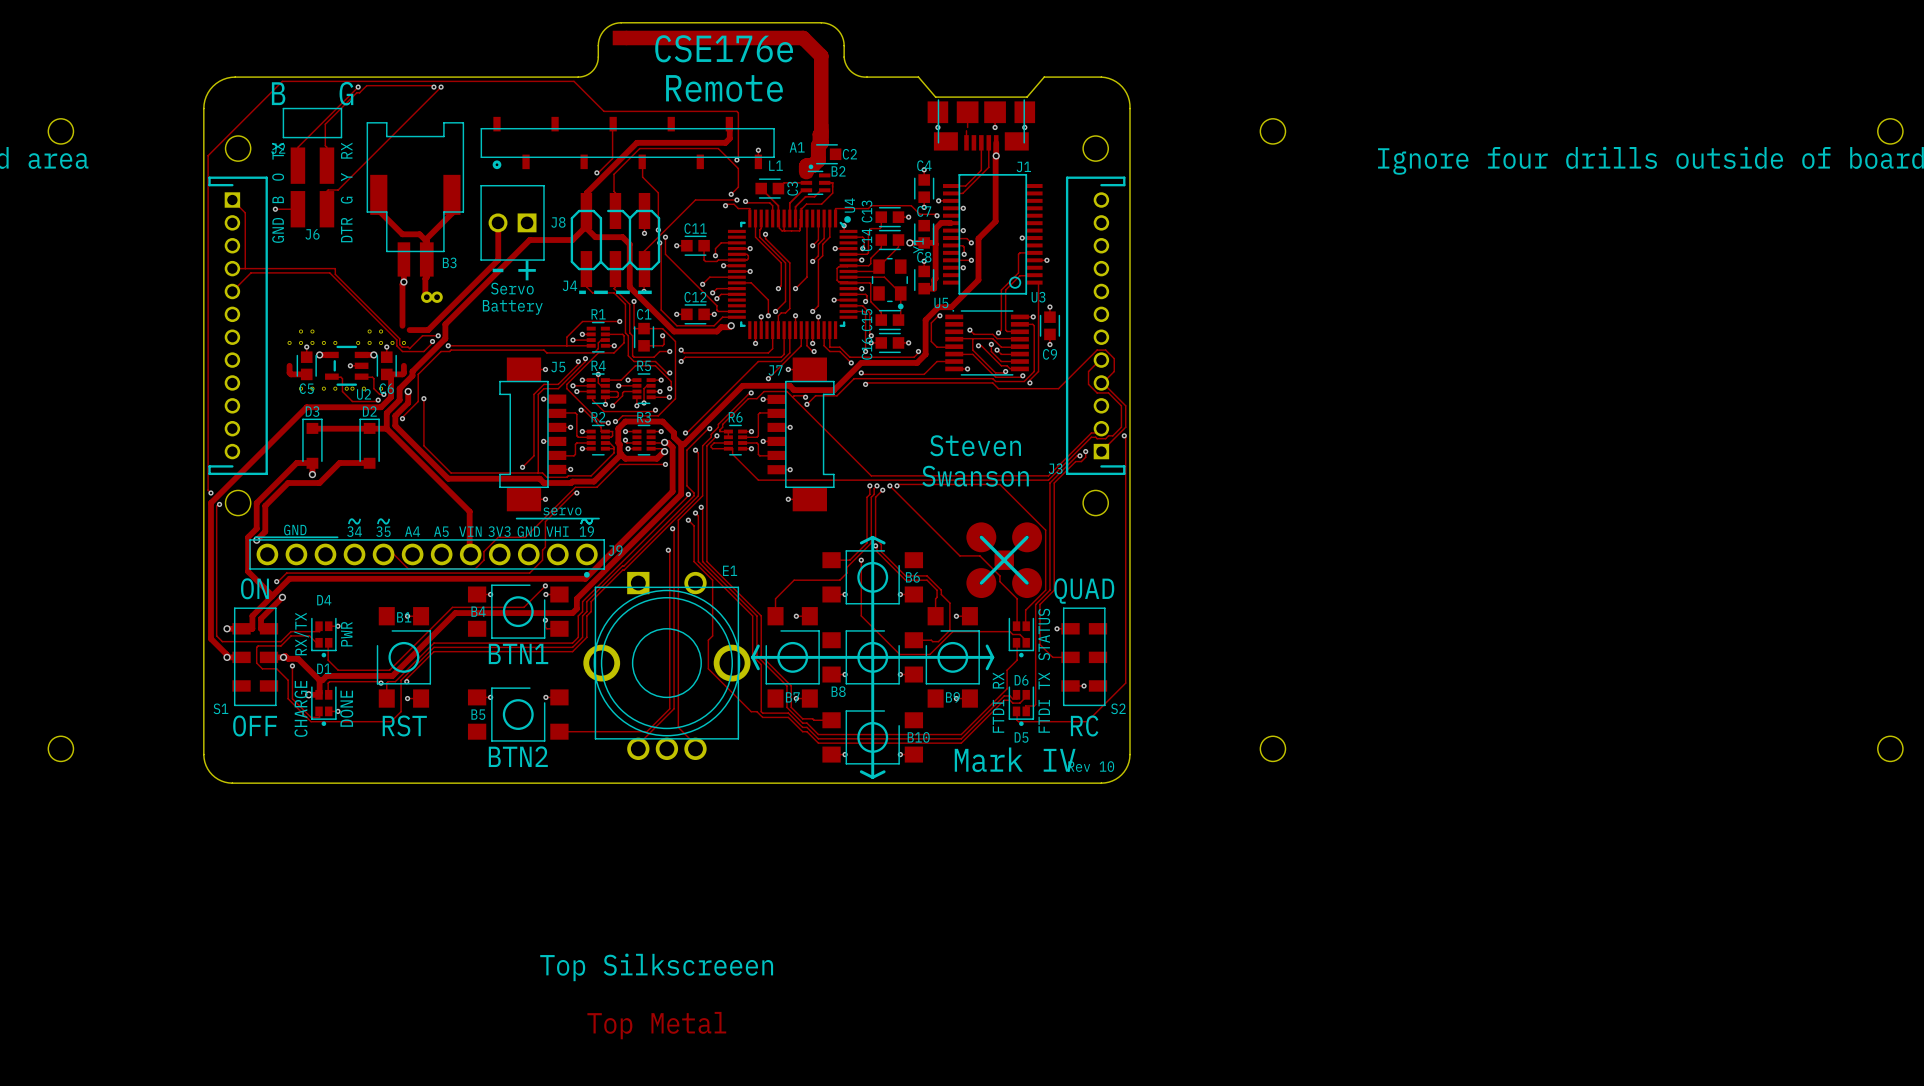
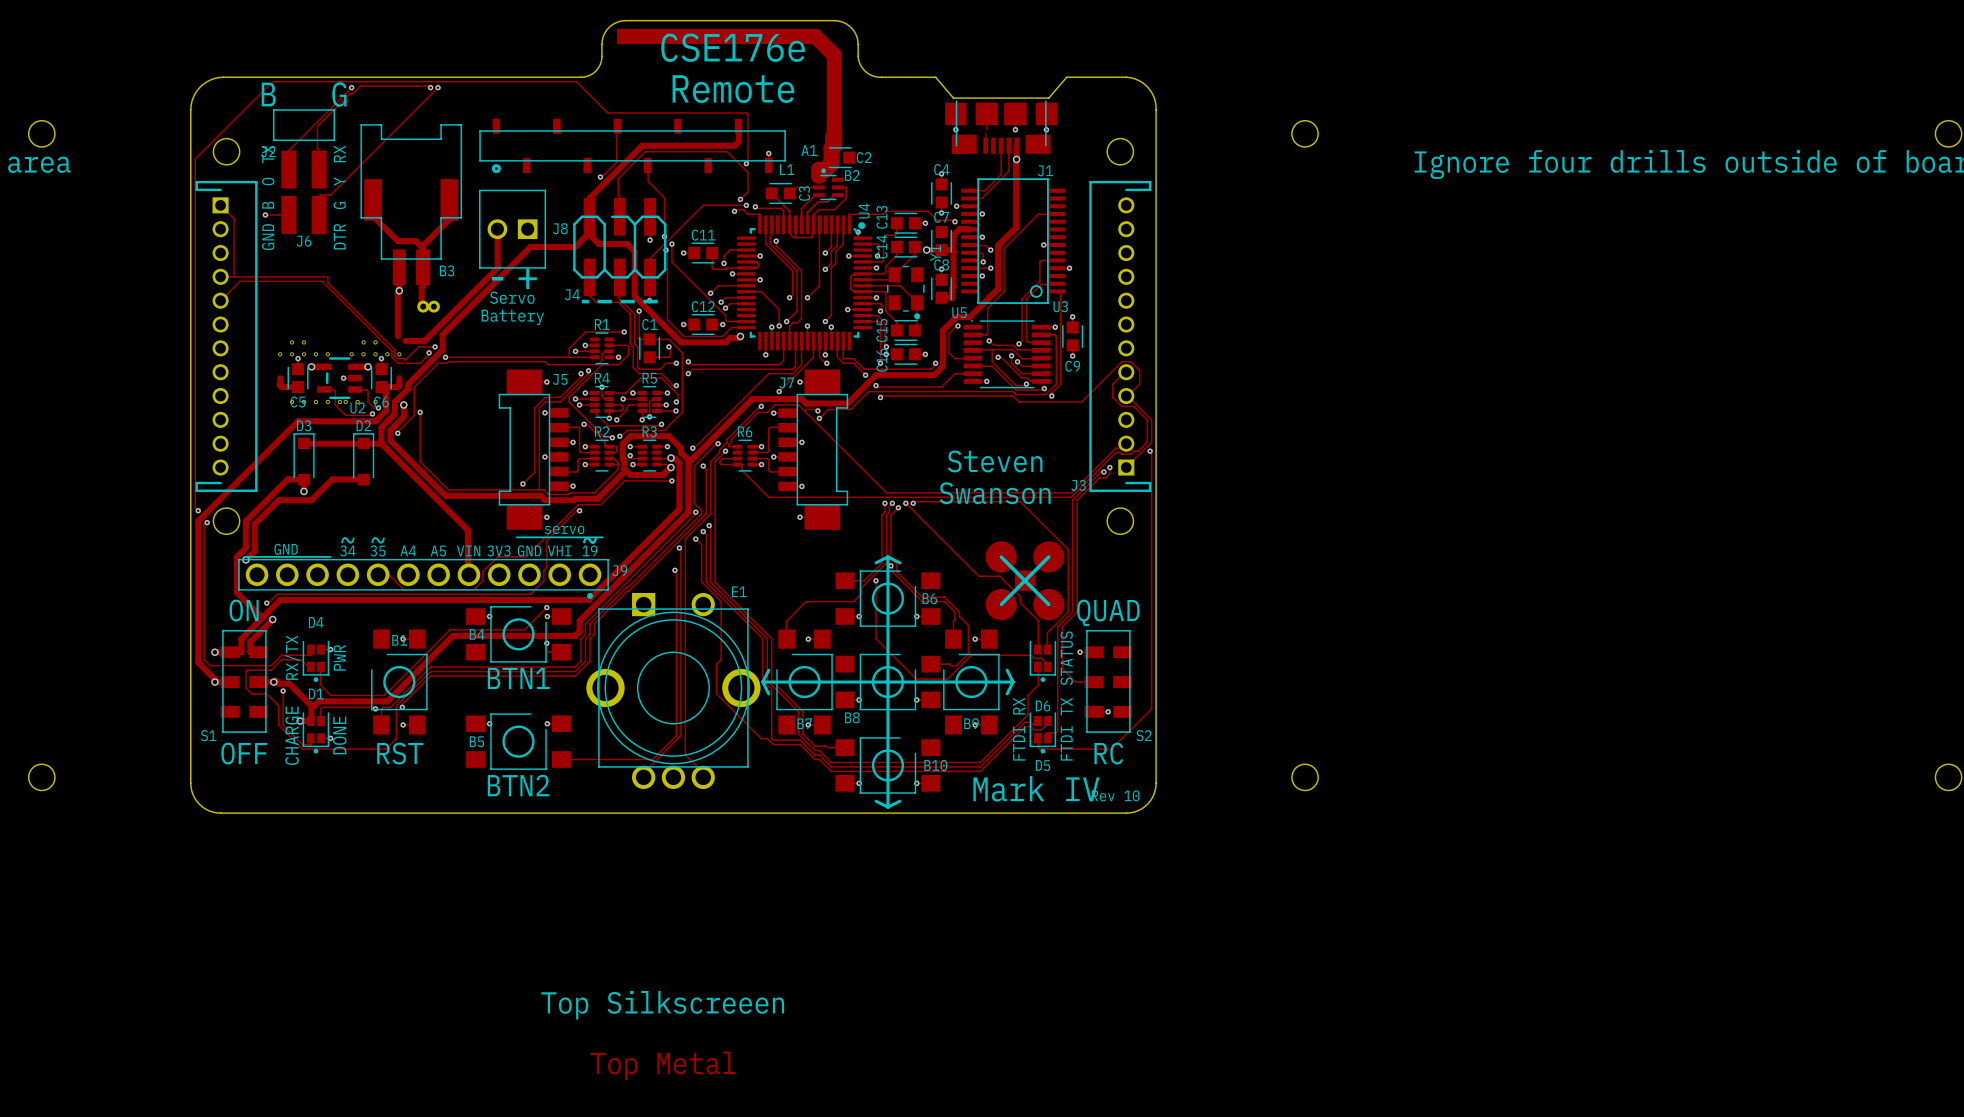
track: none -> (1056, 213) (1038, 214) (1004, 248) (1004, 291) (987, 308) (987, 333) (972, 334)

